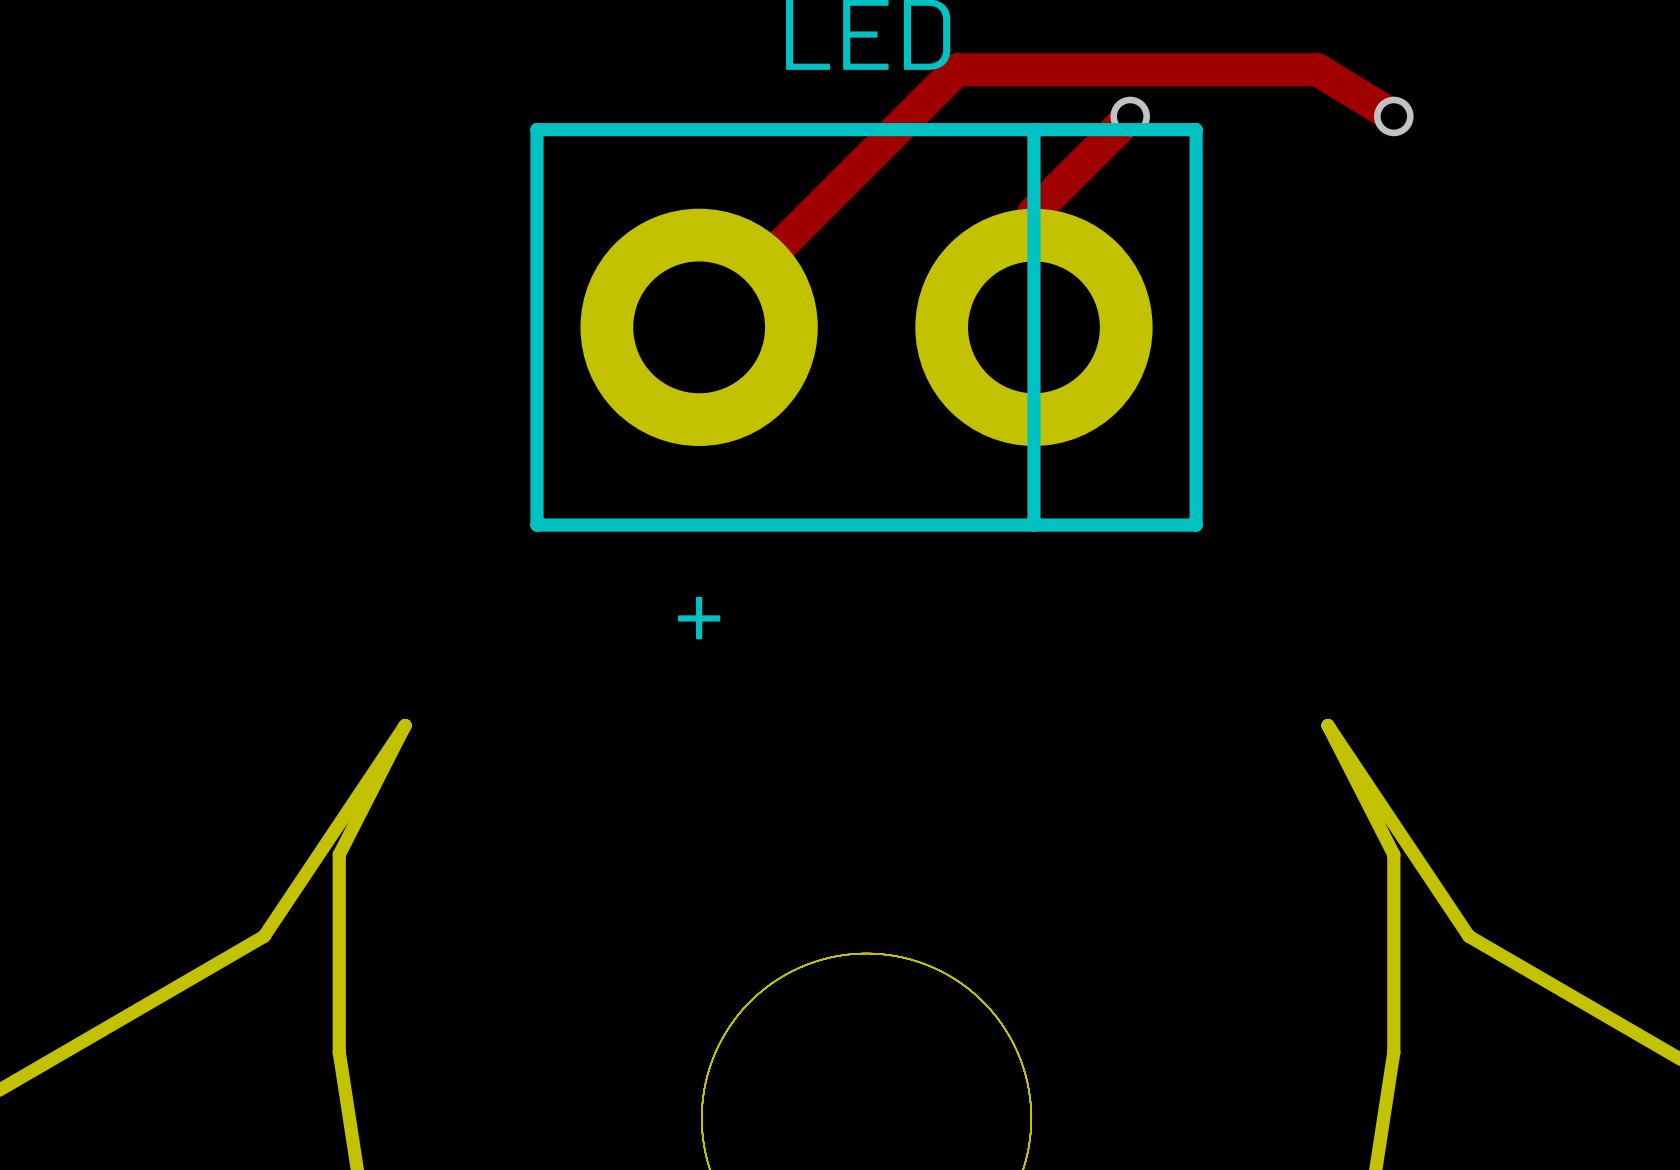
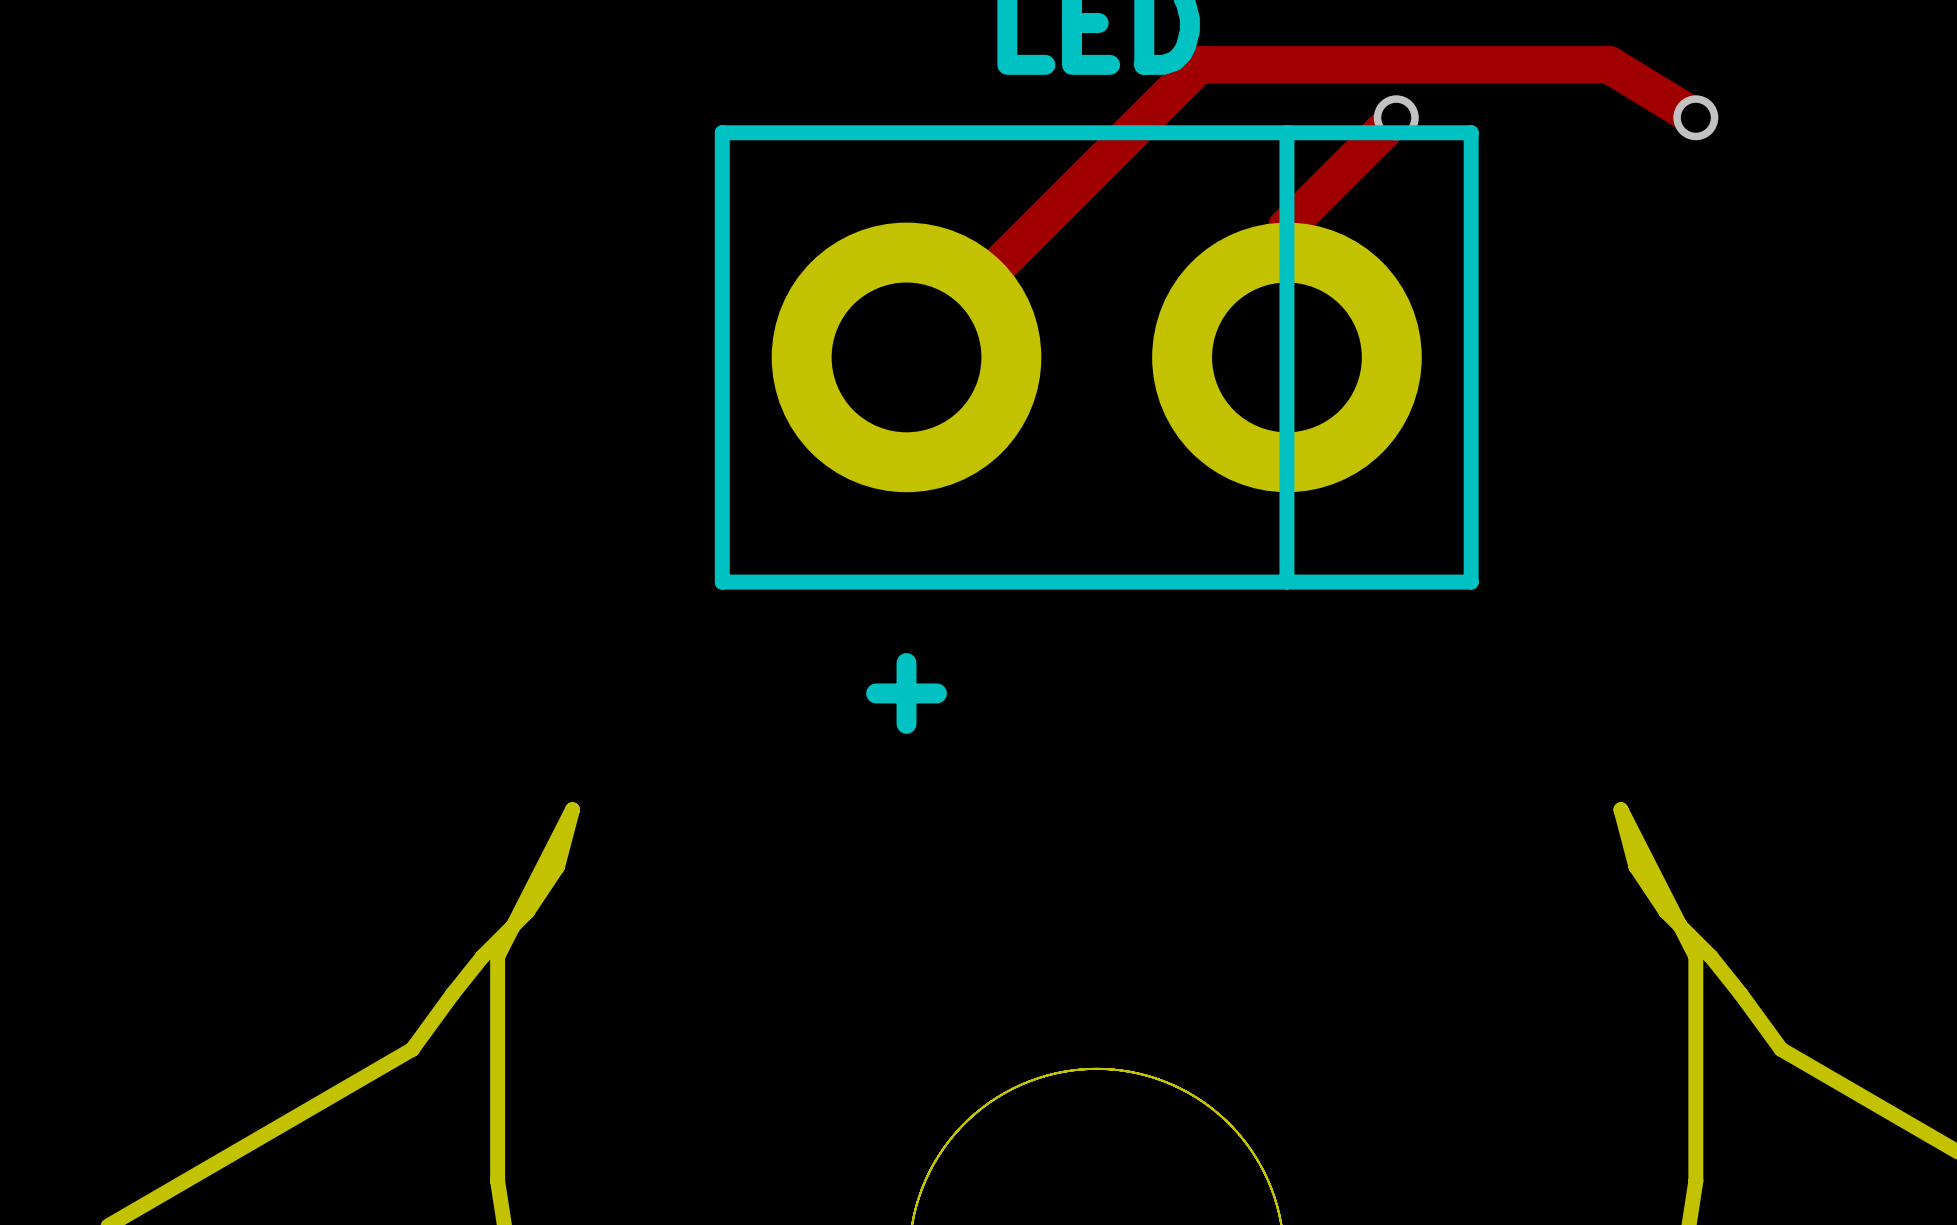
board edge: (405, 725) (264, 936) -> (572, 809) (557, 866) (527, 911) (482, 956) (412, 1049)
board edge: (1327, 725) (1468, 936) -> (1620, 809) (1635, 866) (1665, 911) (1710, 956) (1781, 1049)

